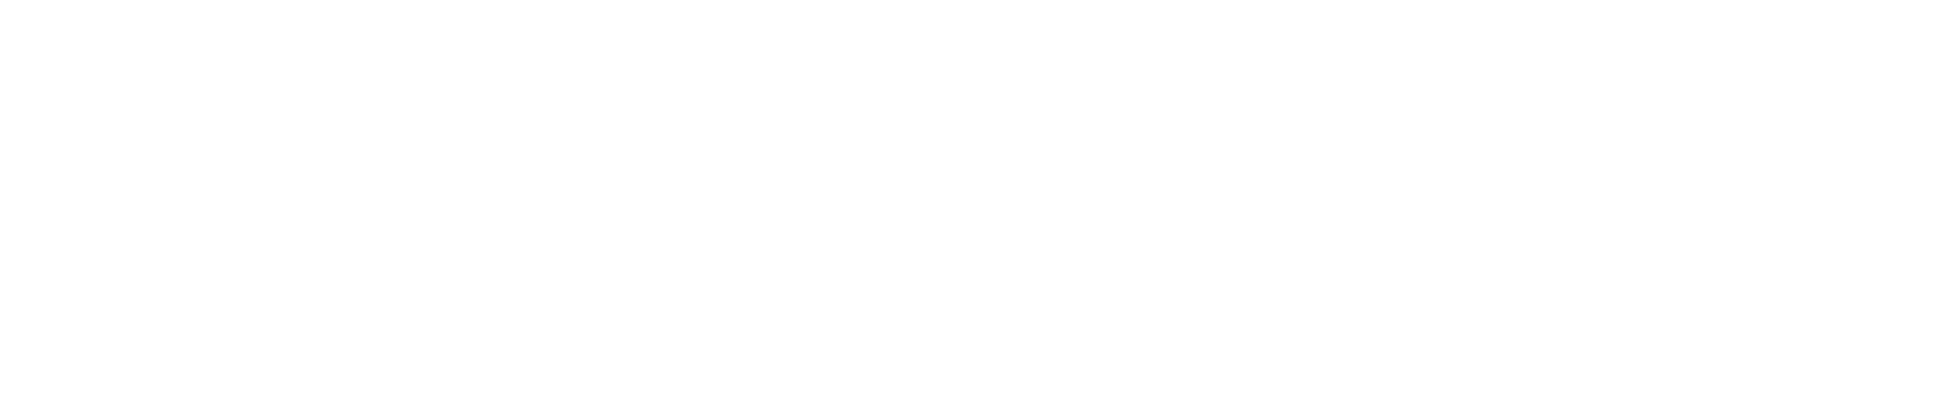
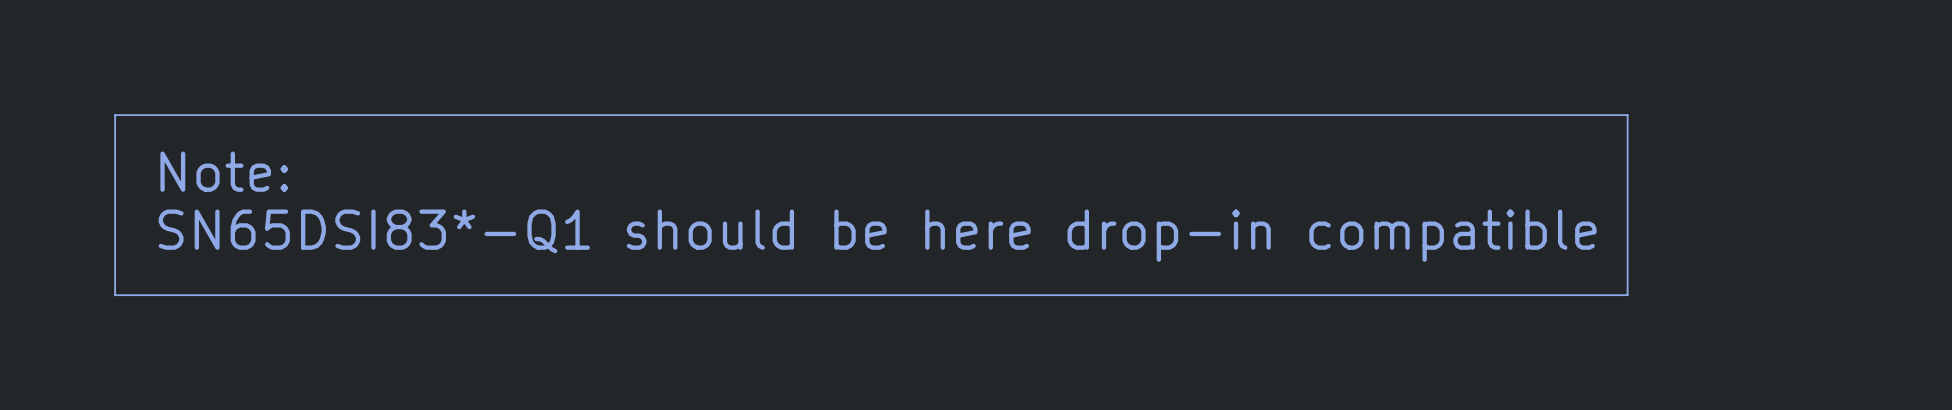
line: none -> (115, 115) (115, 295) (1627, 295) (1627, 115) (115, 115)
text: none -> Note: (224, 171)
text: none -> SN65DSI83*-Q1 should be here drop-in compatible (877, 235)

